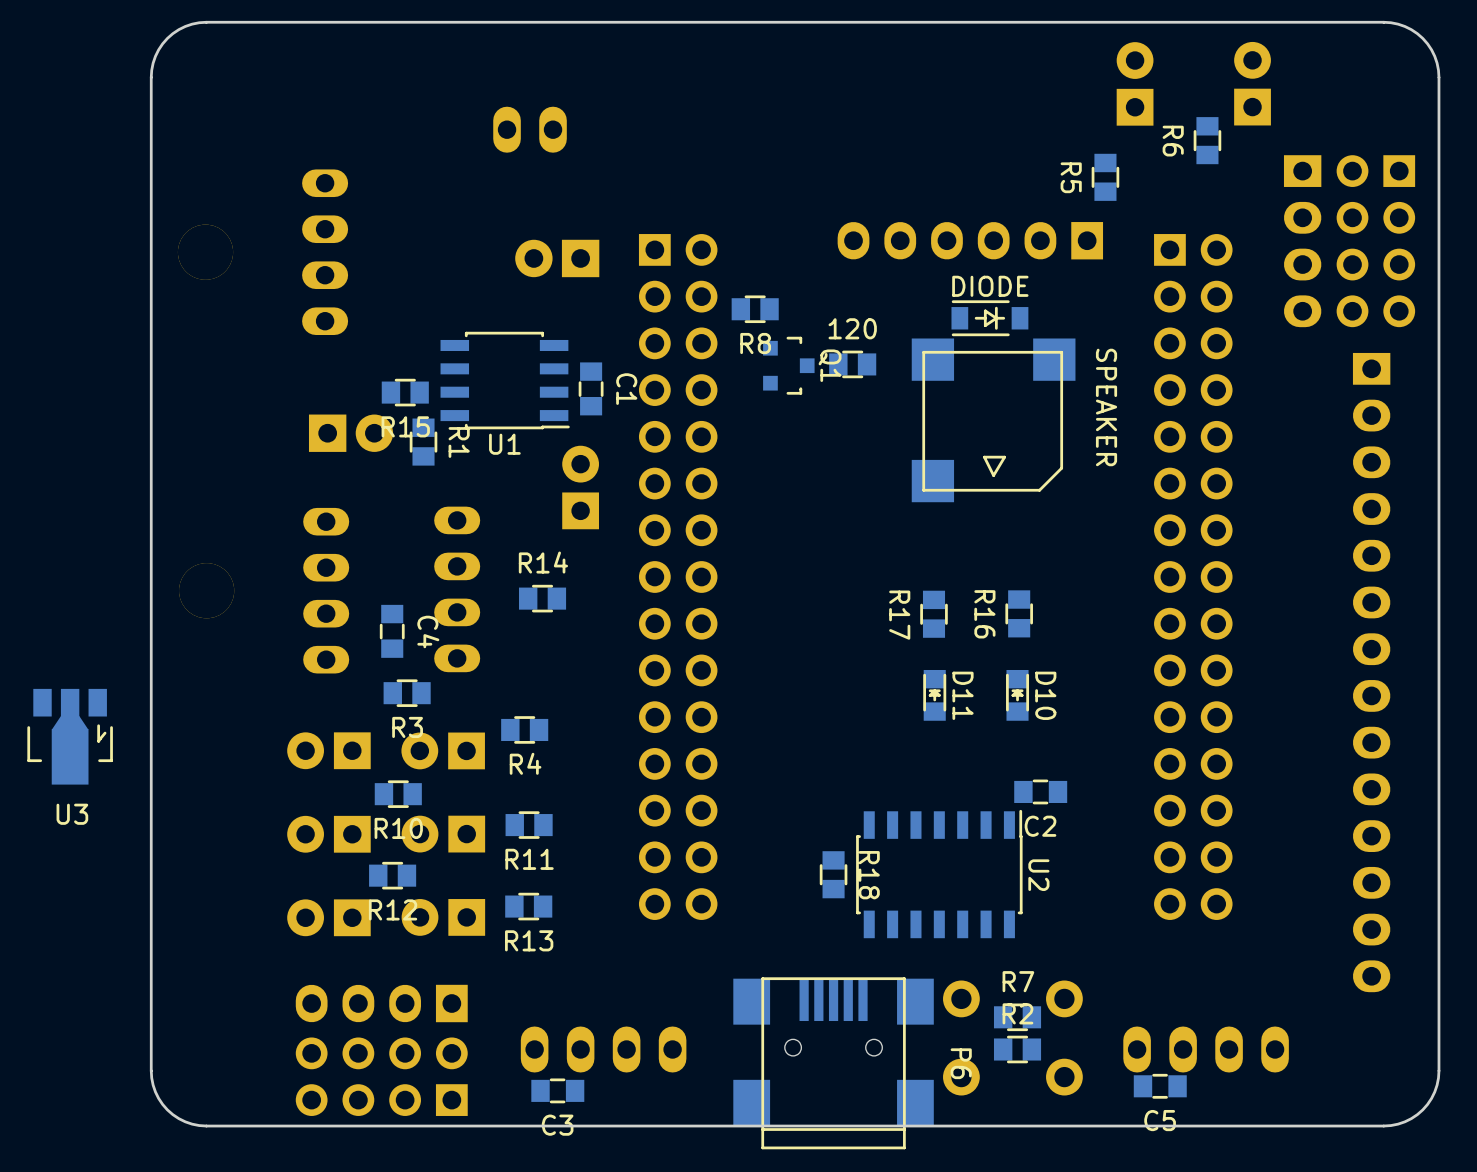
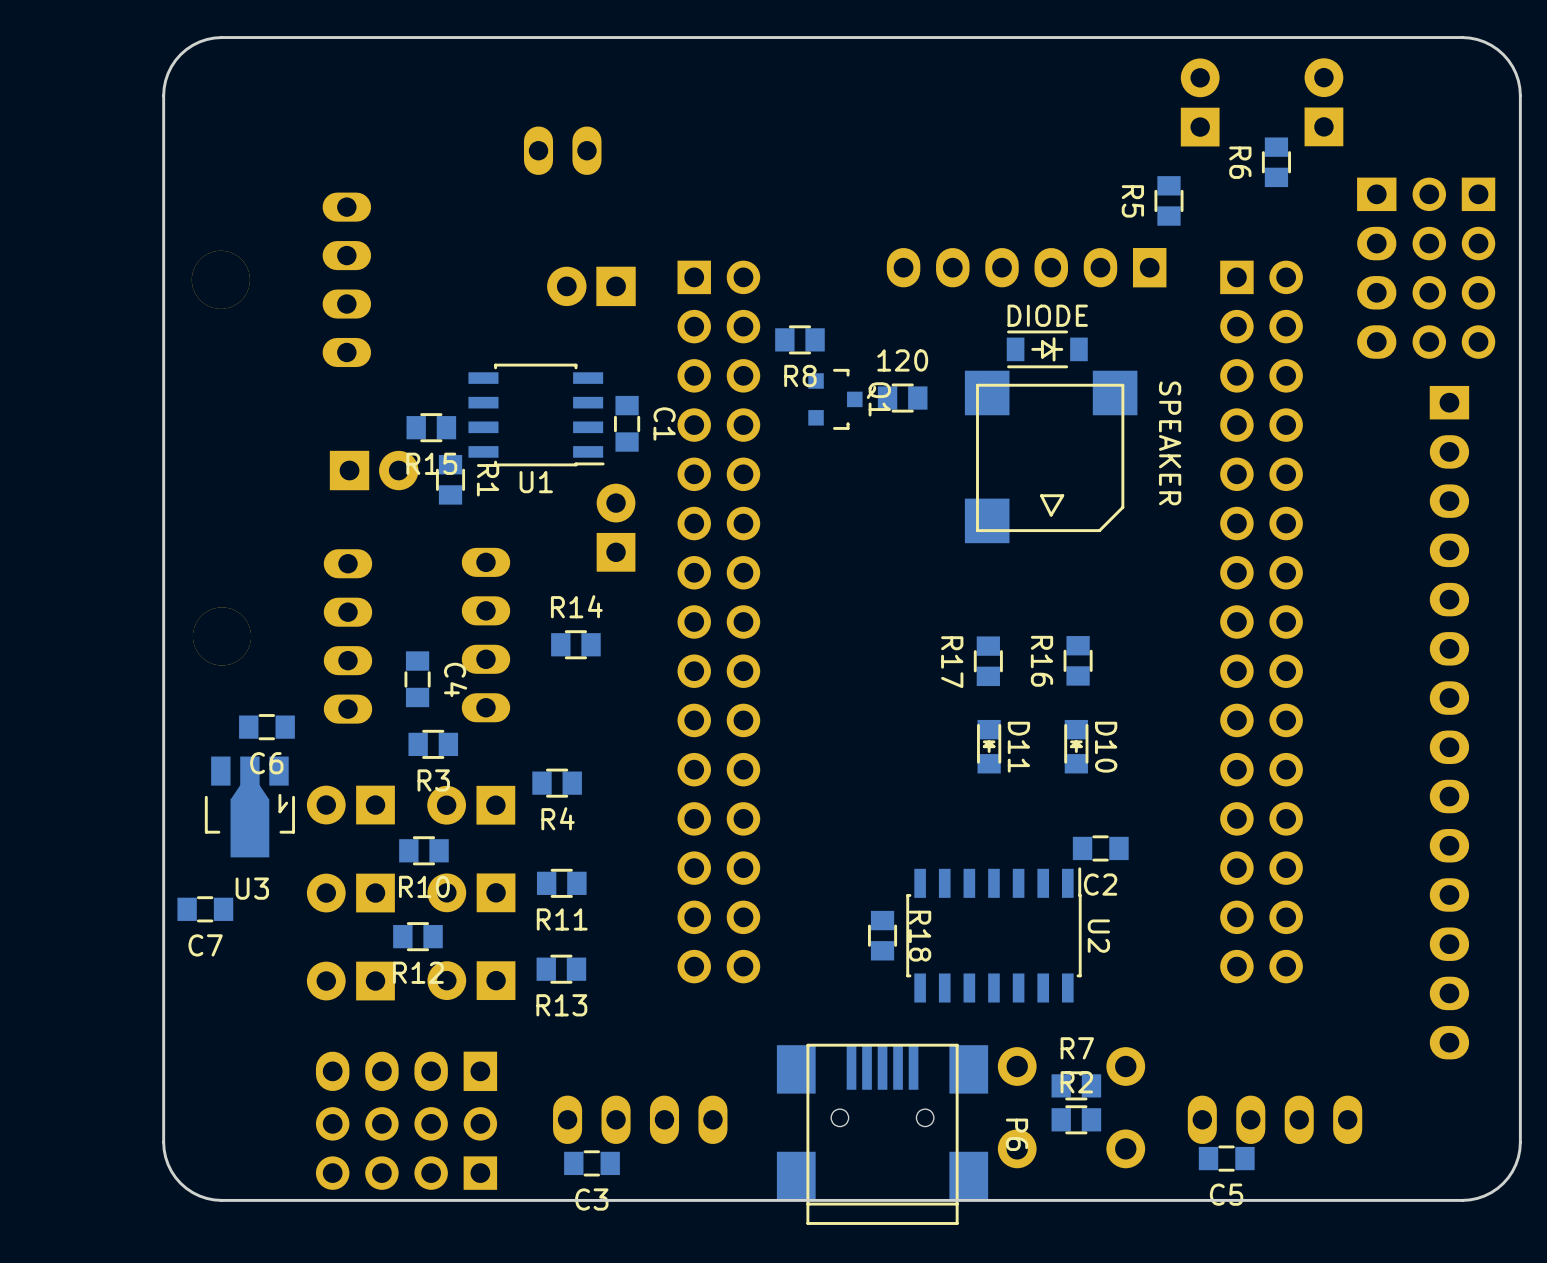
C6: none -> (266, 727)
U3 position: (70, 736) -> (249, 806)
C7: none -> (205, 909)

